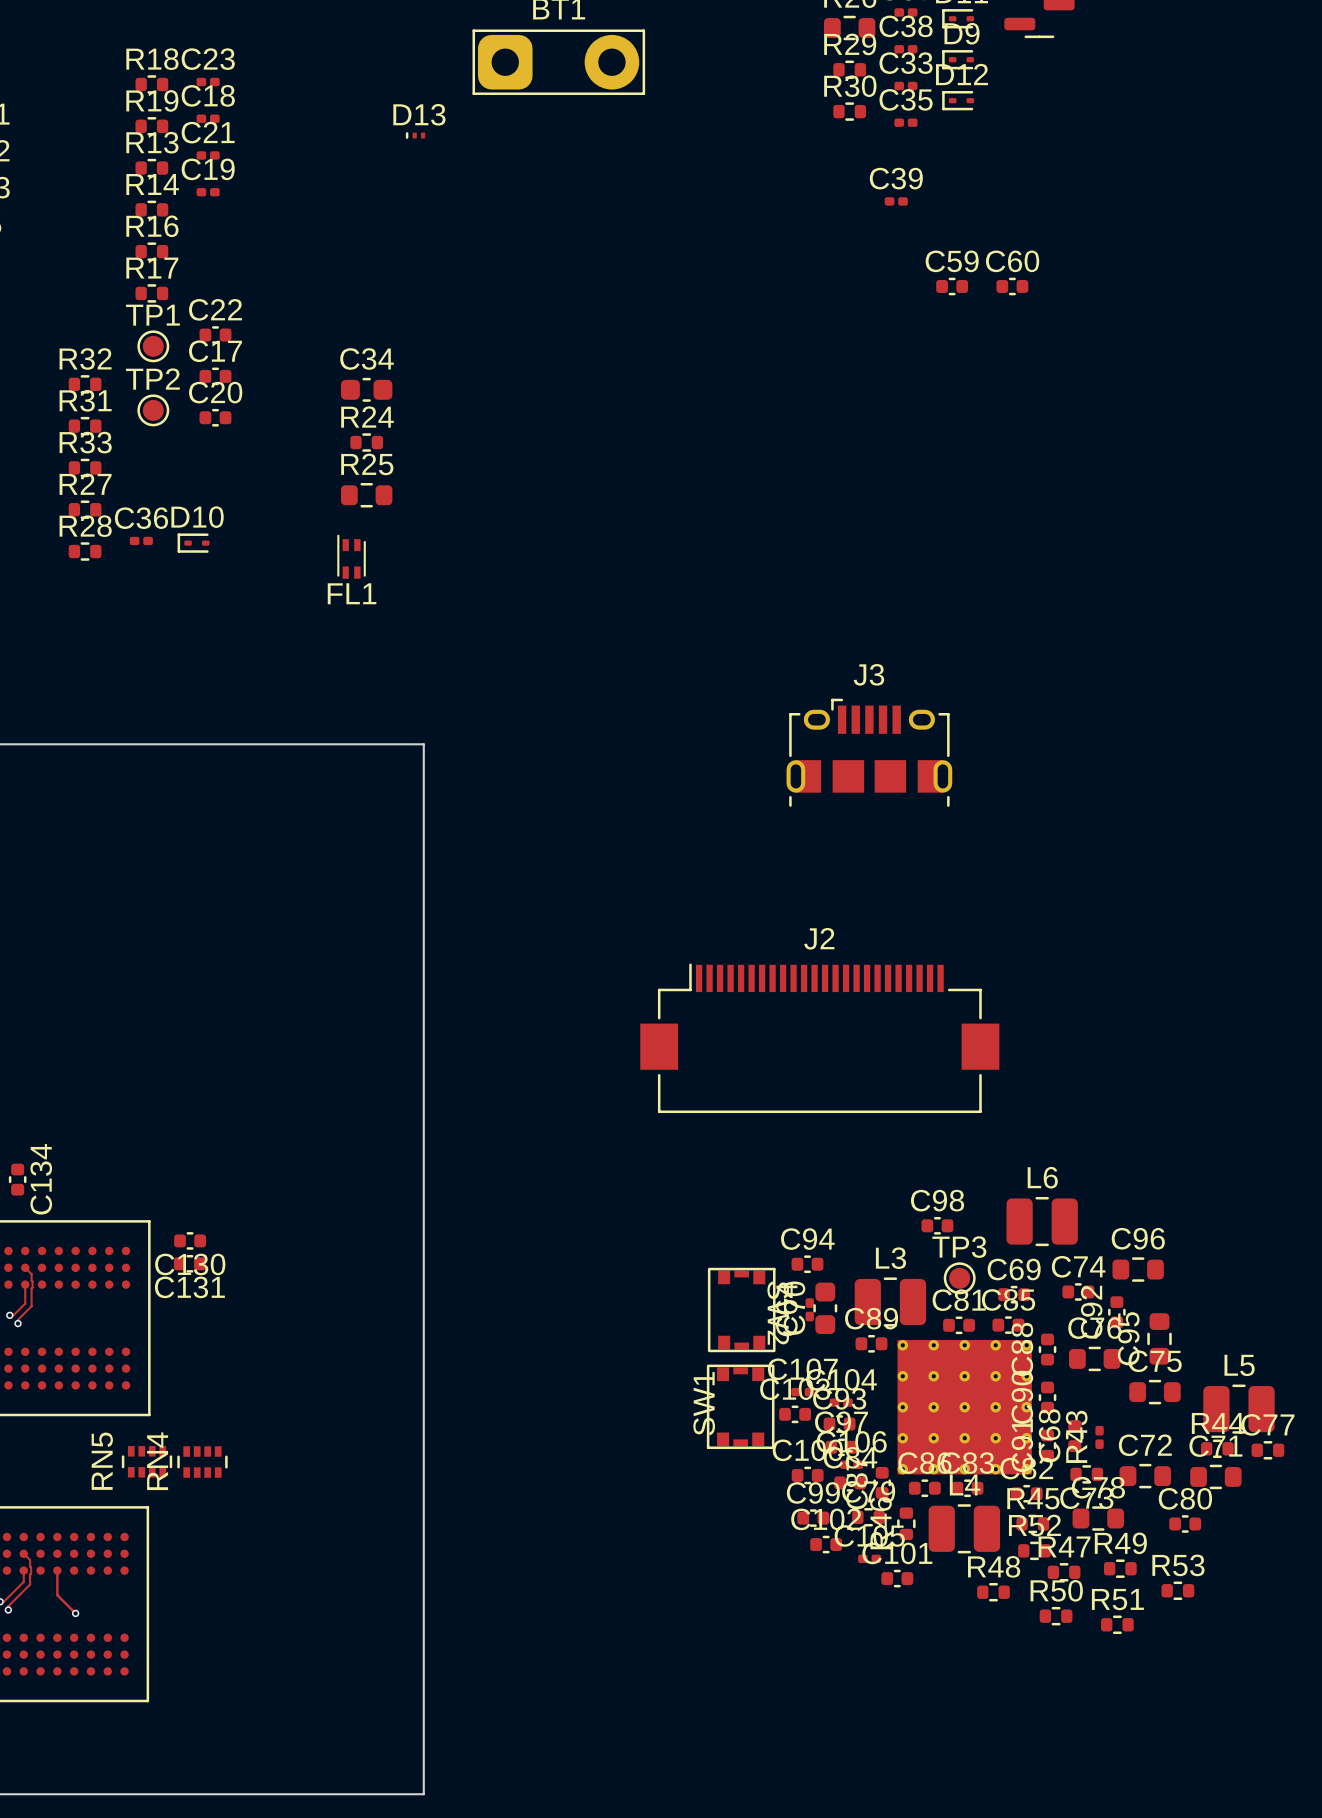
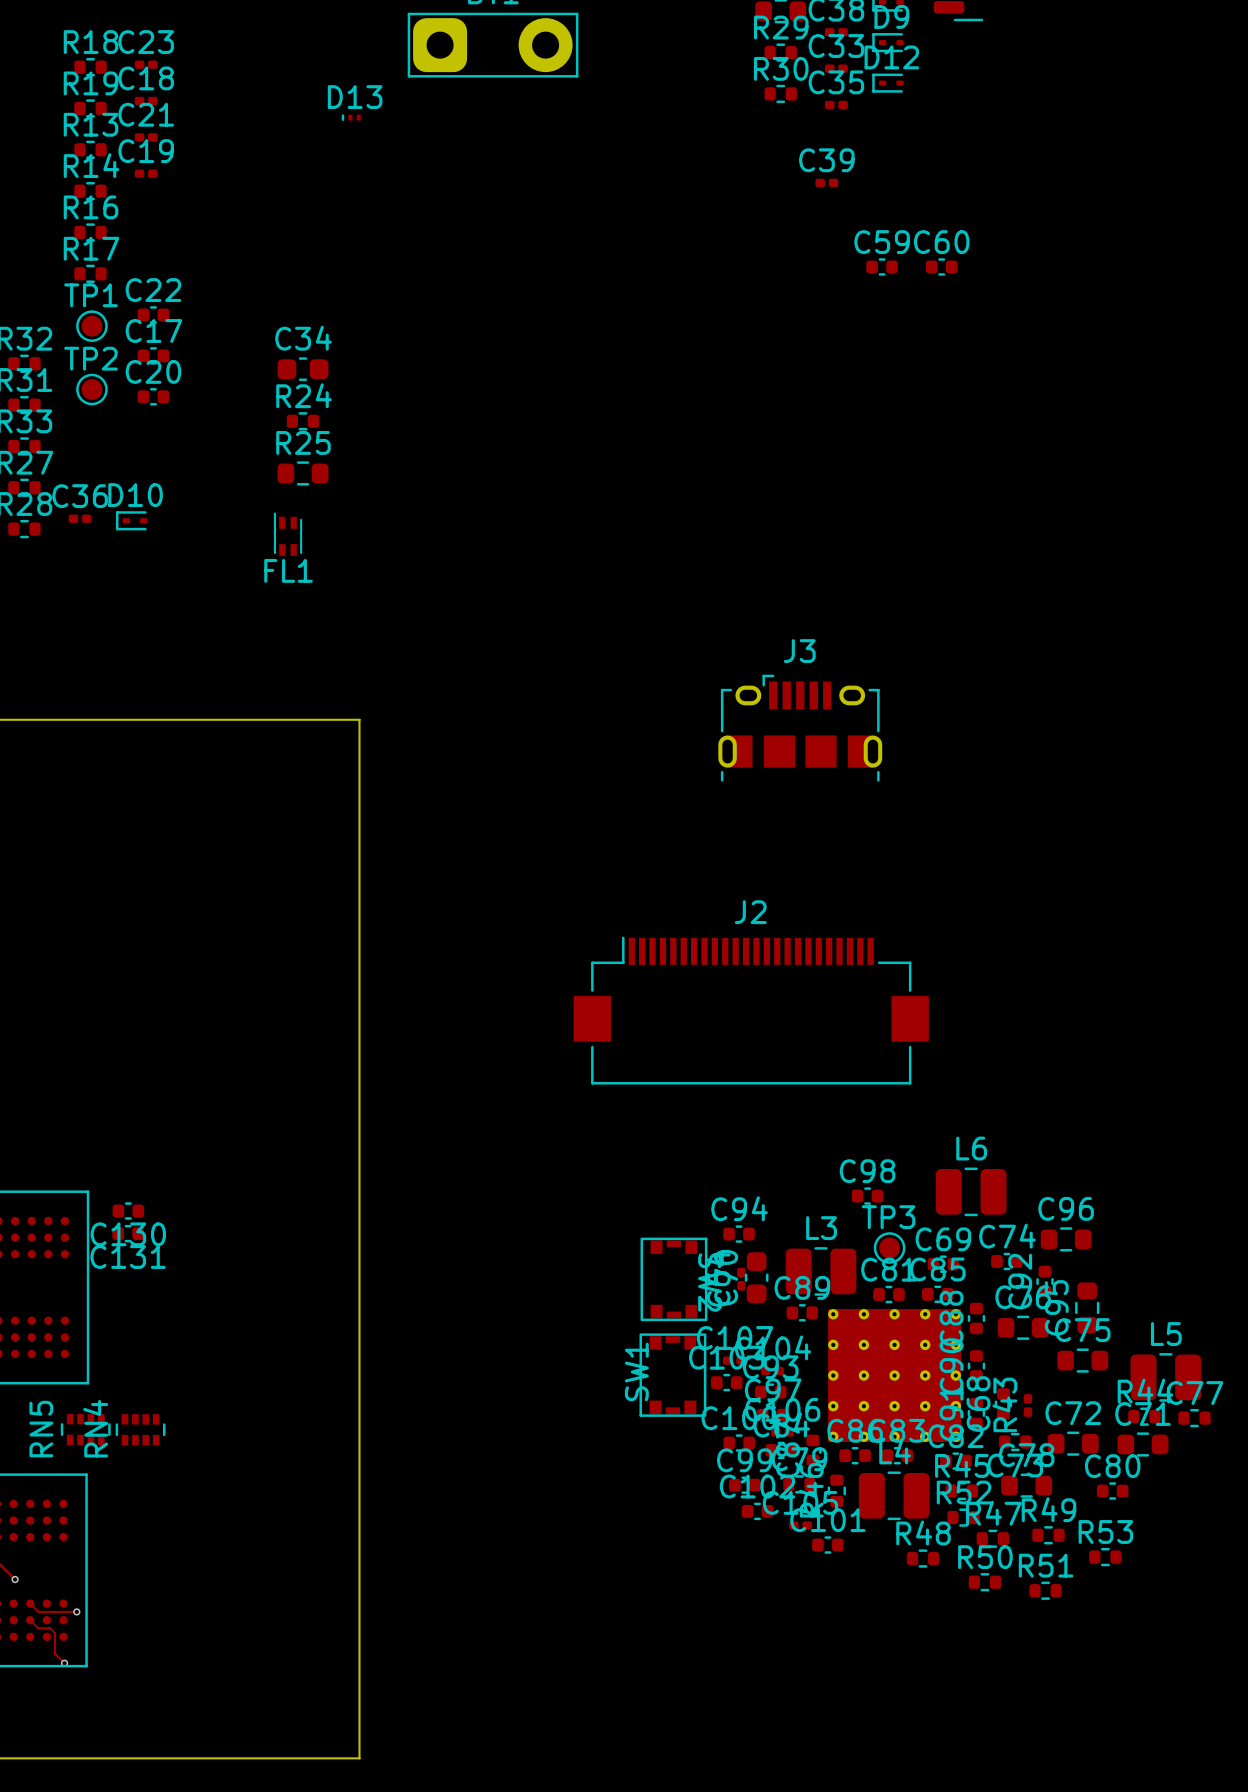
track: none -> (30, 1603) (38, 1611) (76, 1611)
via: none -> (76, 1611)
track: none -> (30, 1620) (38, 1628)
track: none -> (38, 1628) (50, 1628) (54, 1633) (54, 1653) (64, 1663)
via: none -> (64, 1663)

